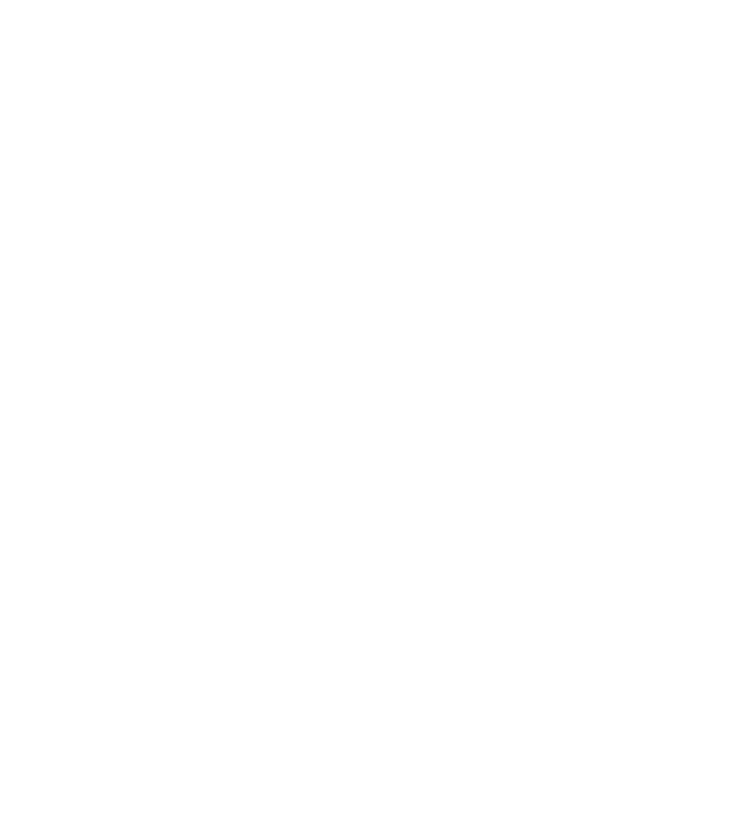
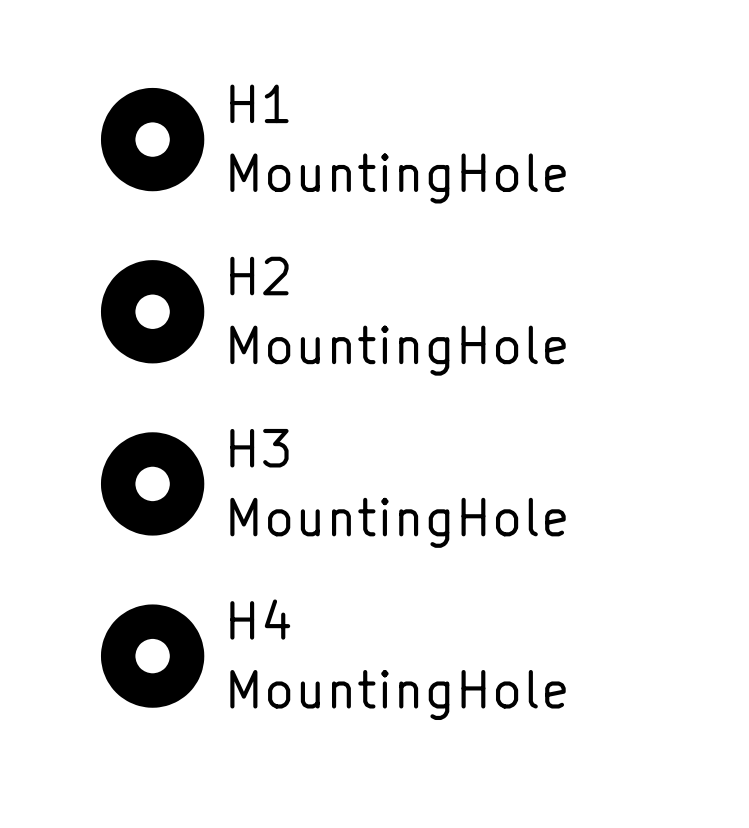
H1: none -> MountingHole (152, 139)
H2: none -> MountingHole (152, 311)
H3: none -> MountingHole (152, 483)
H4: none -> MountingHole (152, 656)

